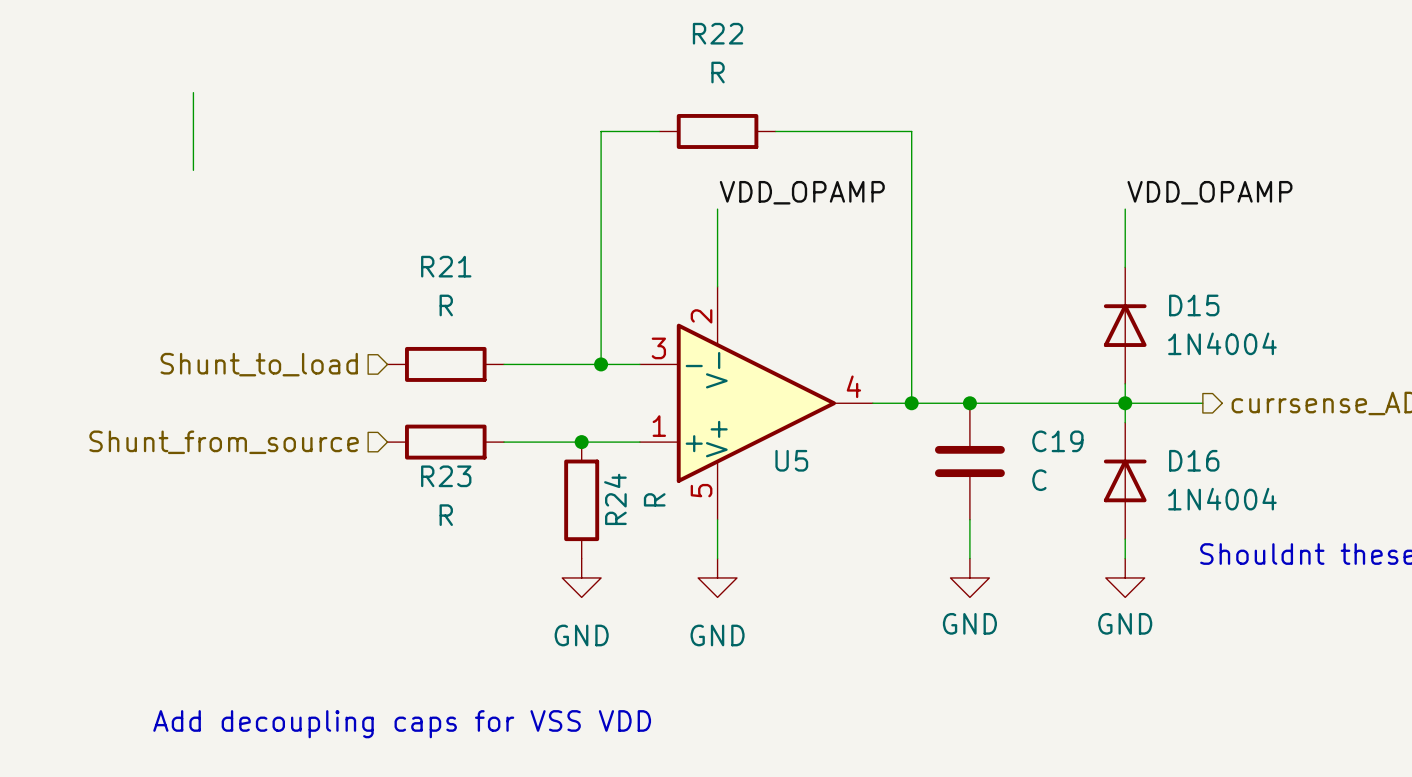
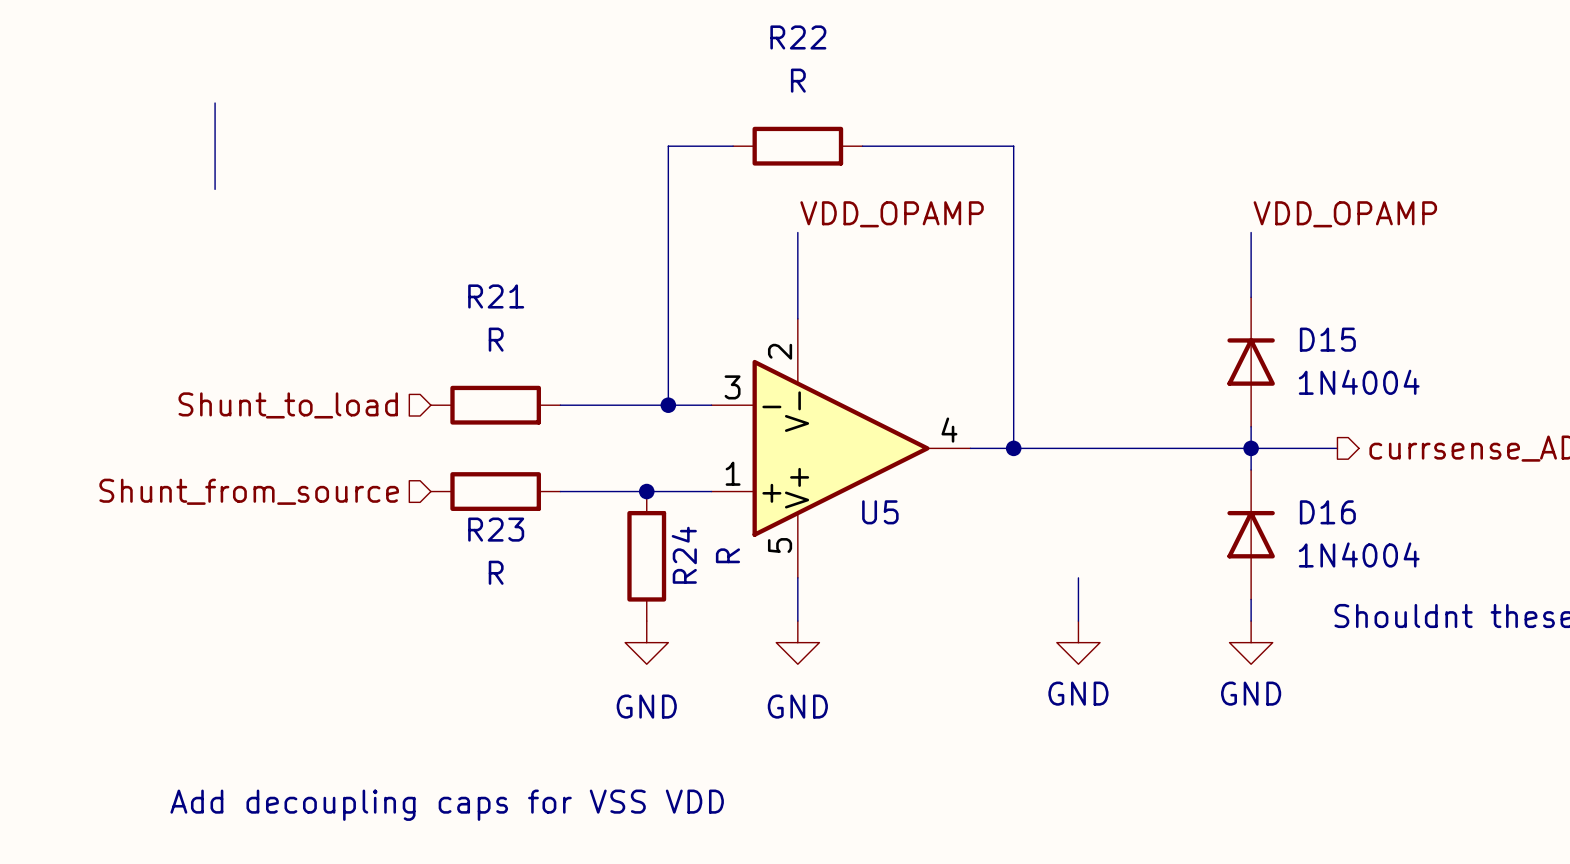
junction: (969, 403) -> none
C19: C (969, 461) -> none

